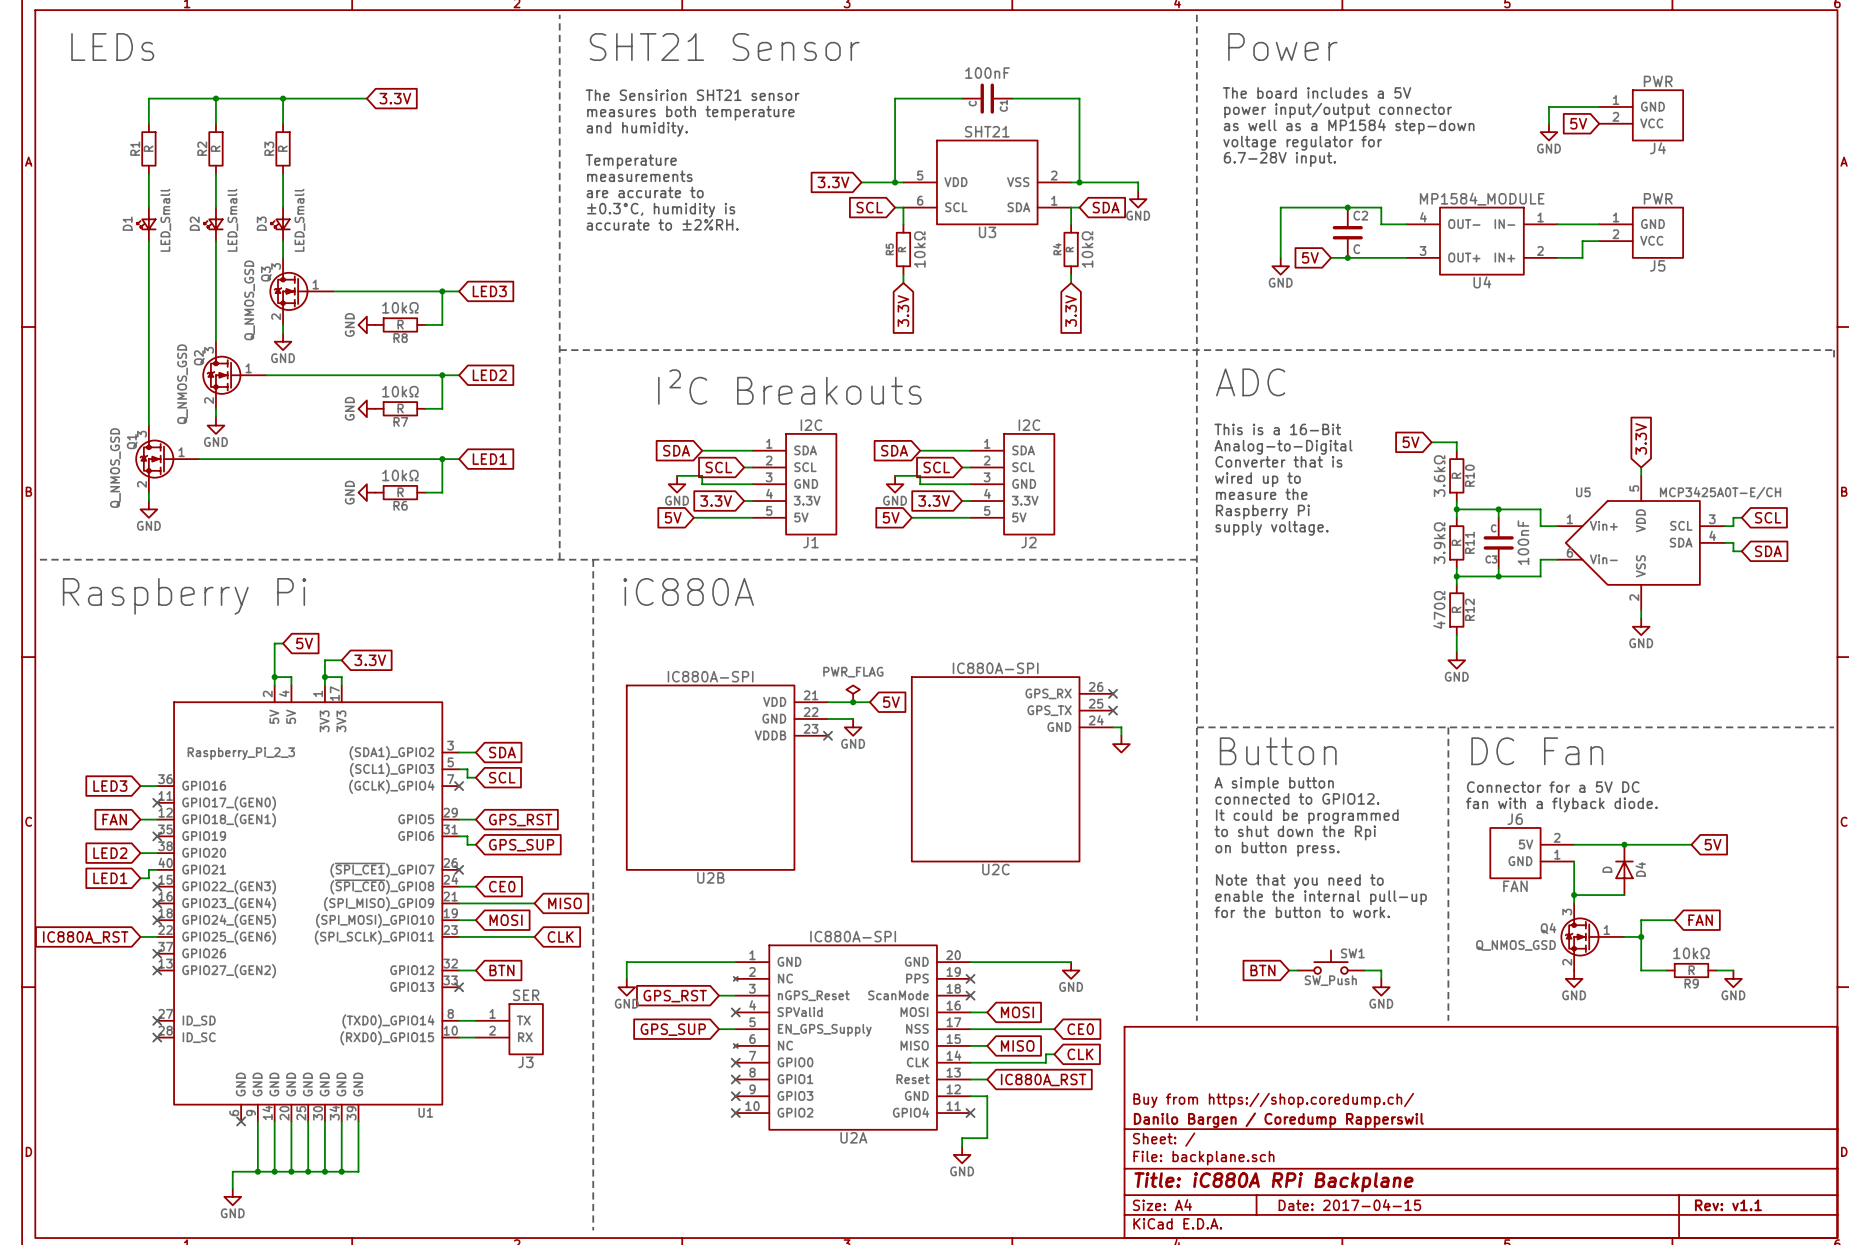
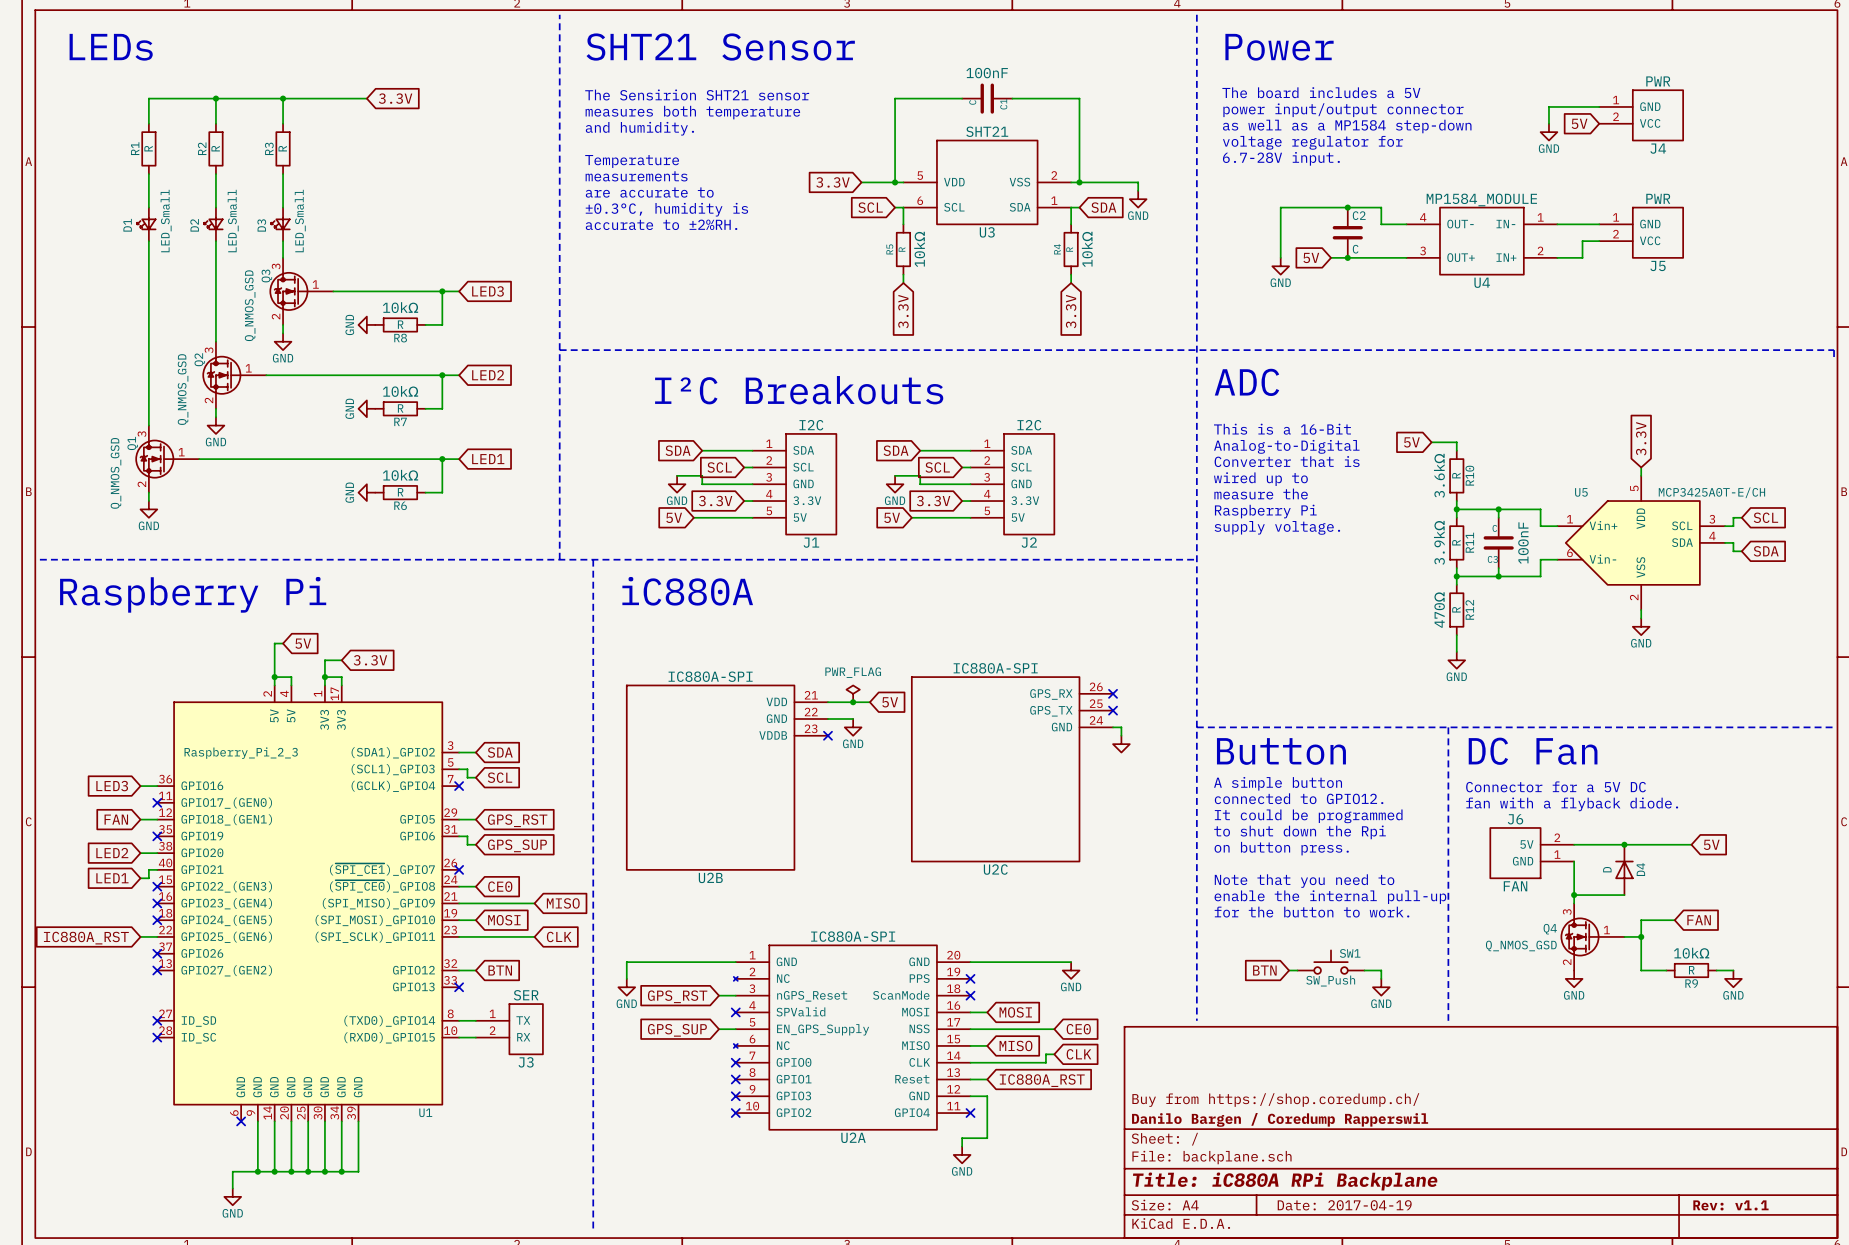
title block: Date: 2017-04-15 (1349, 1205) -> Date: 2017-04-19 (1344, 1205)

